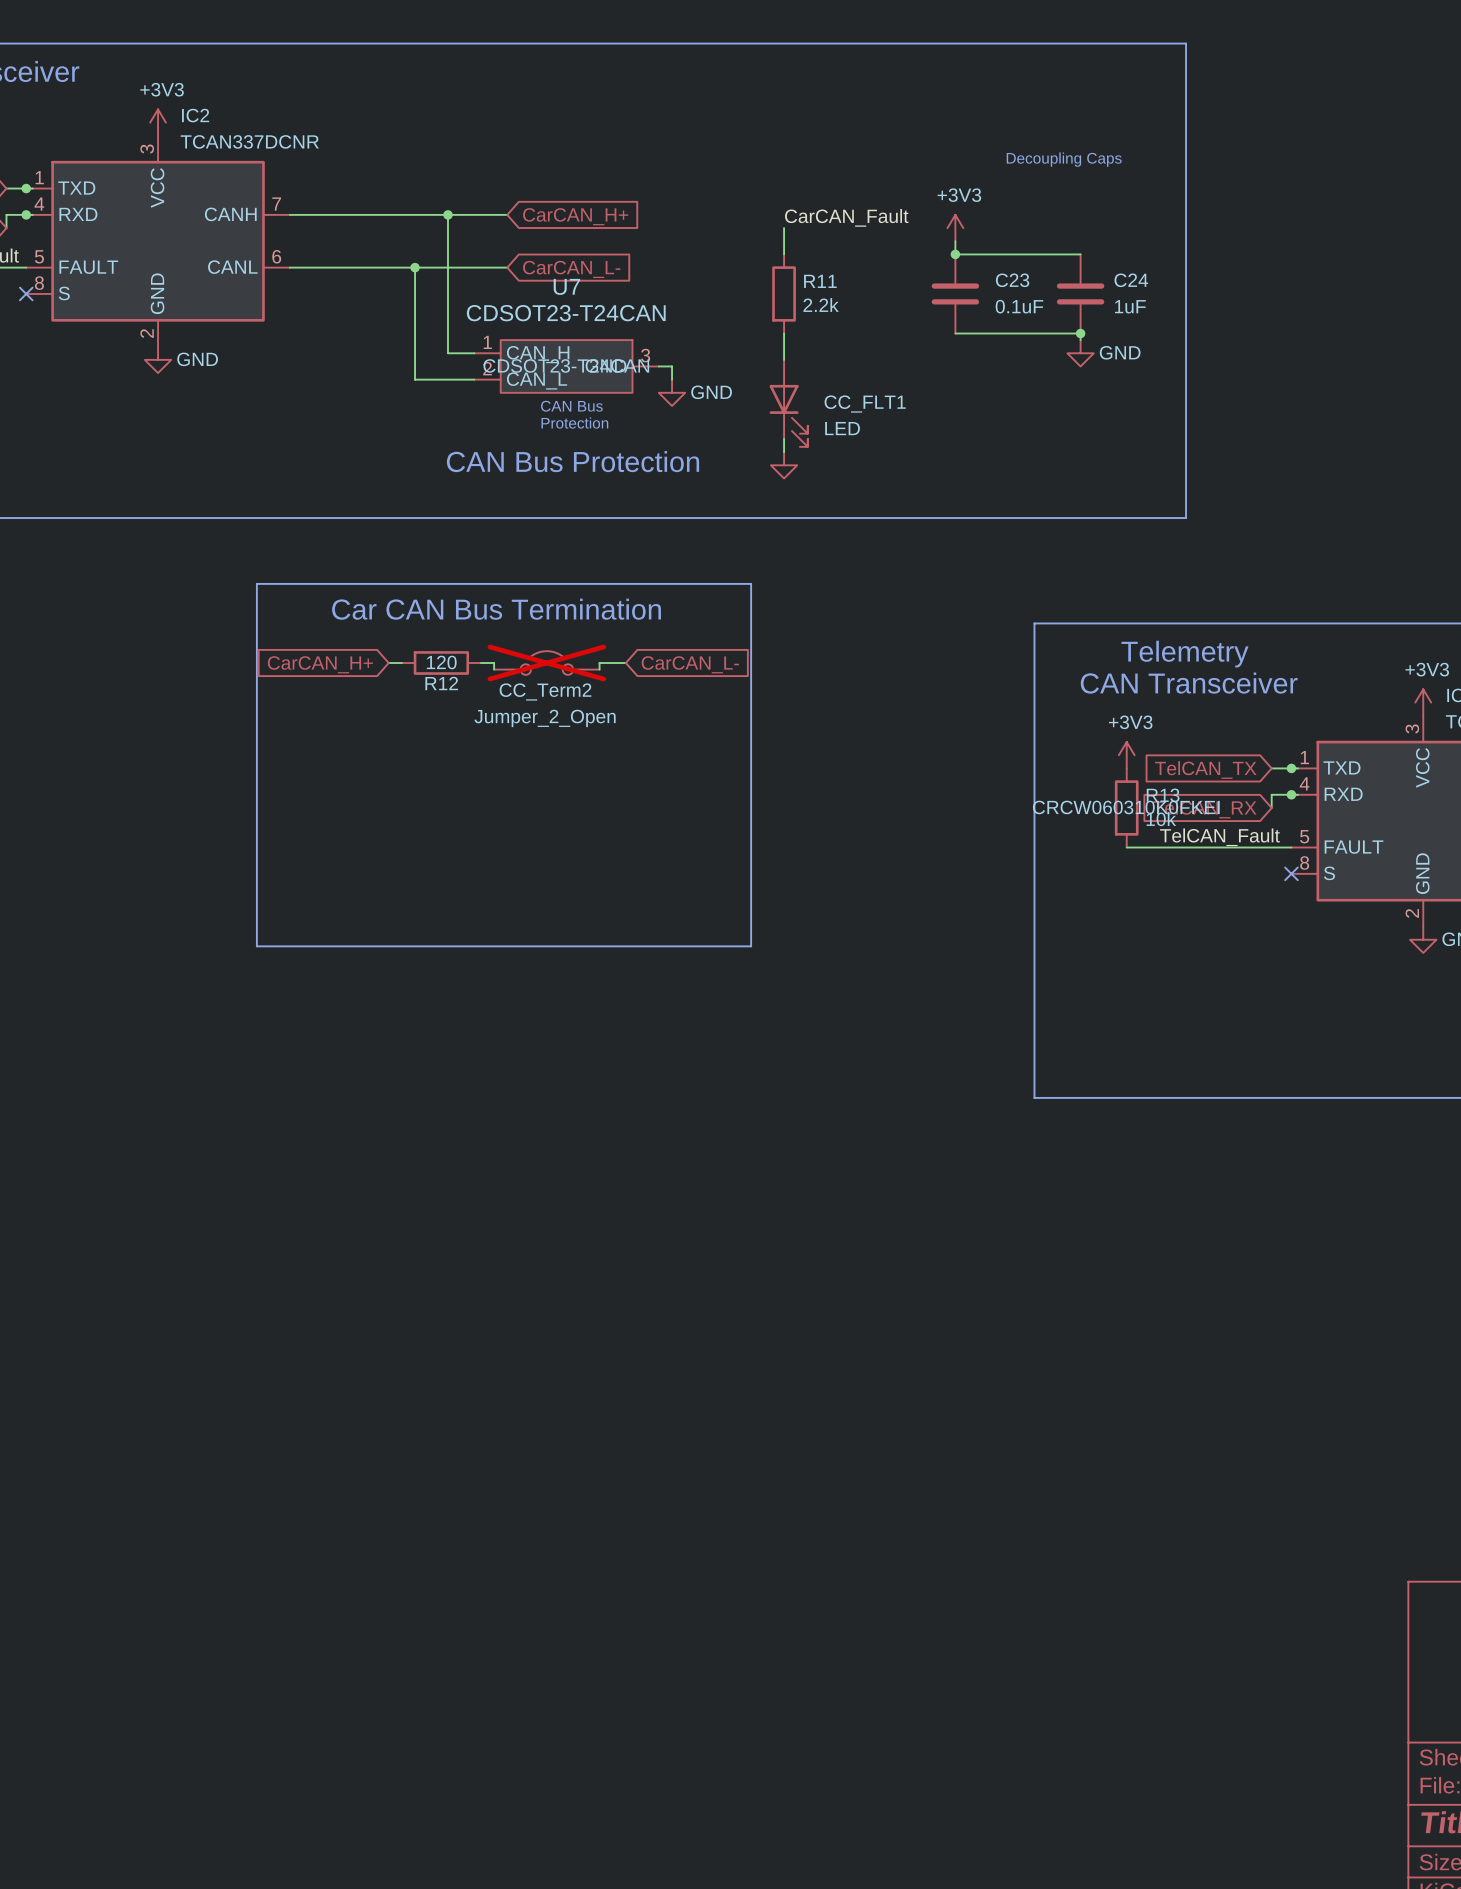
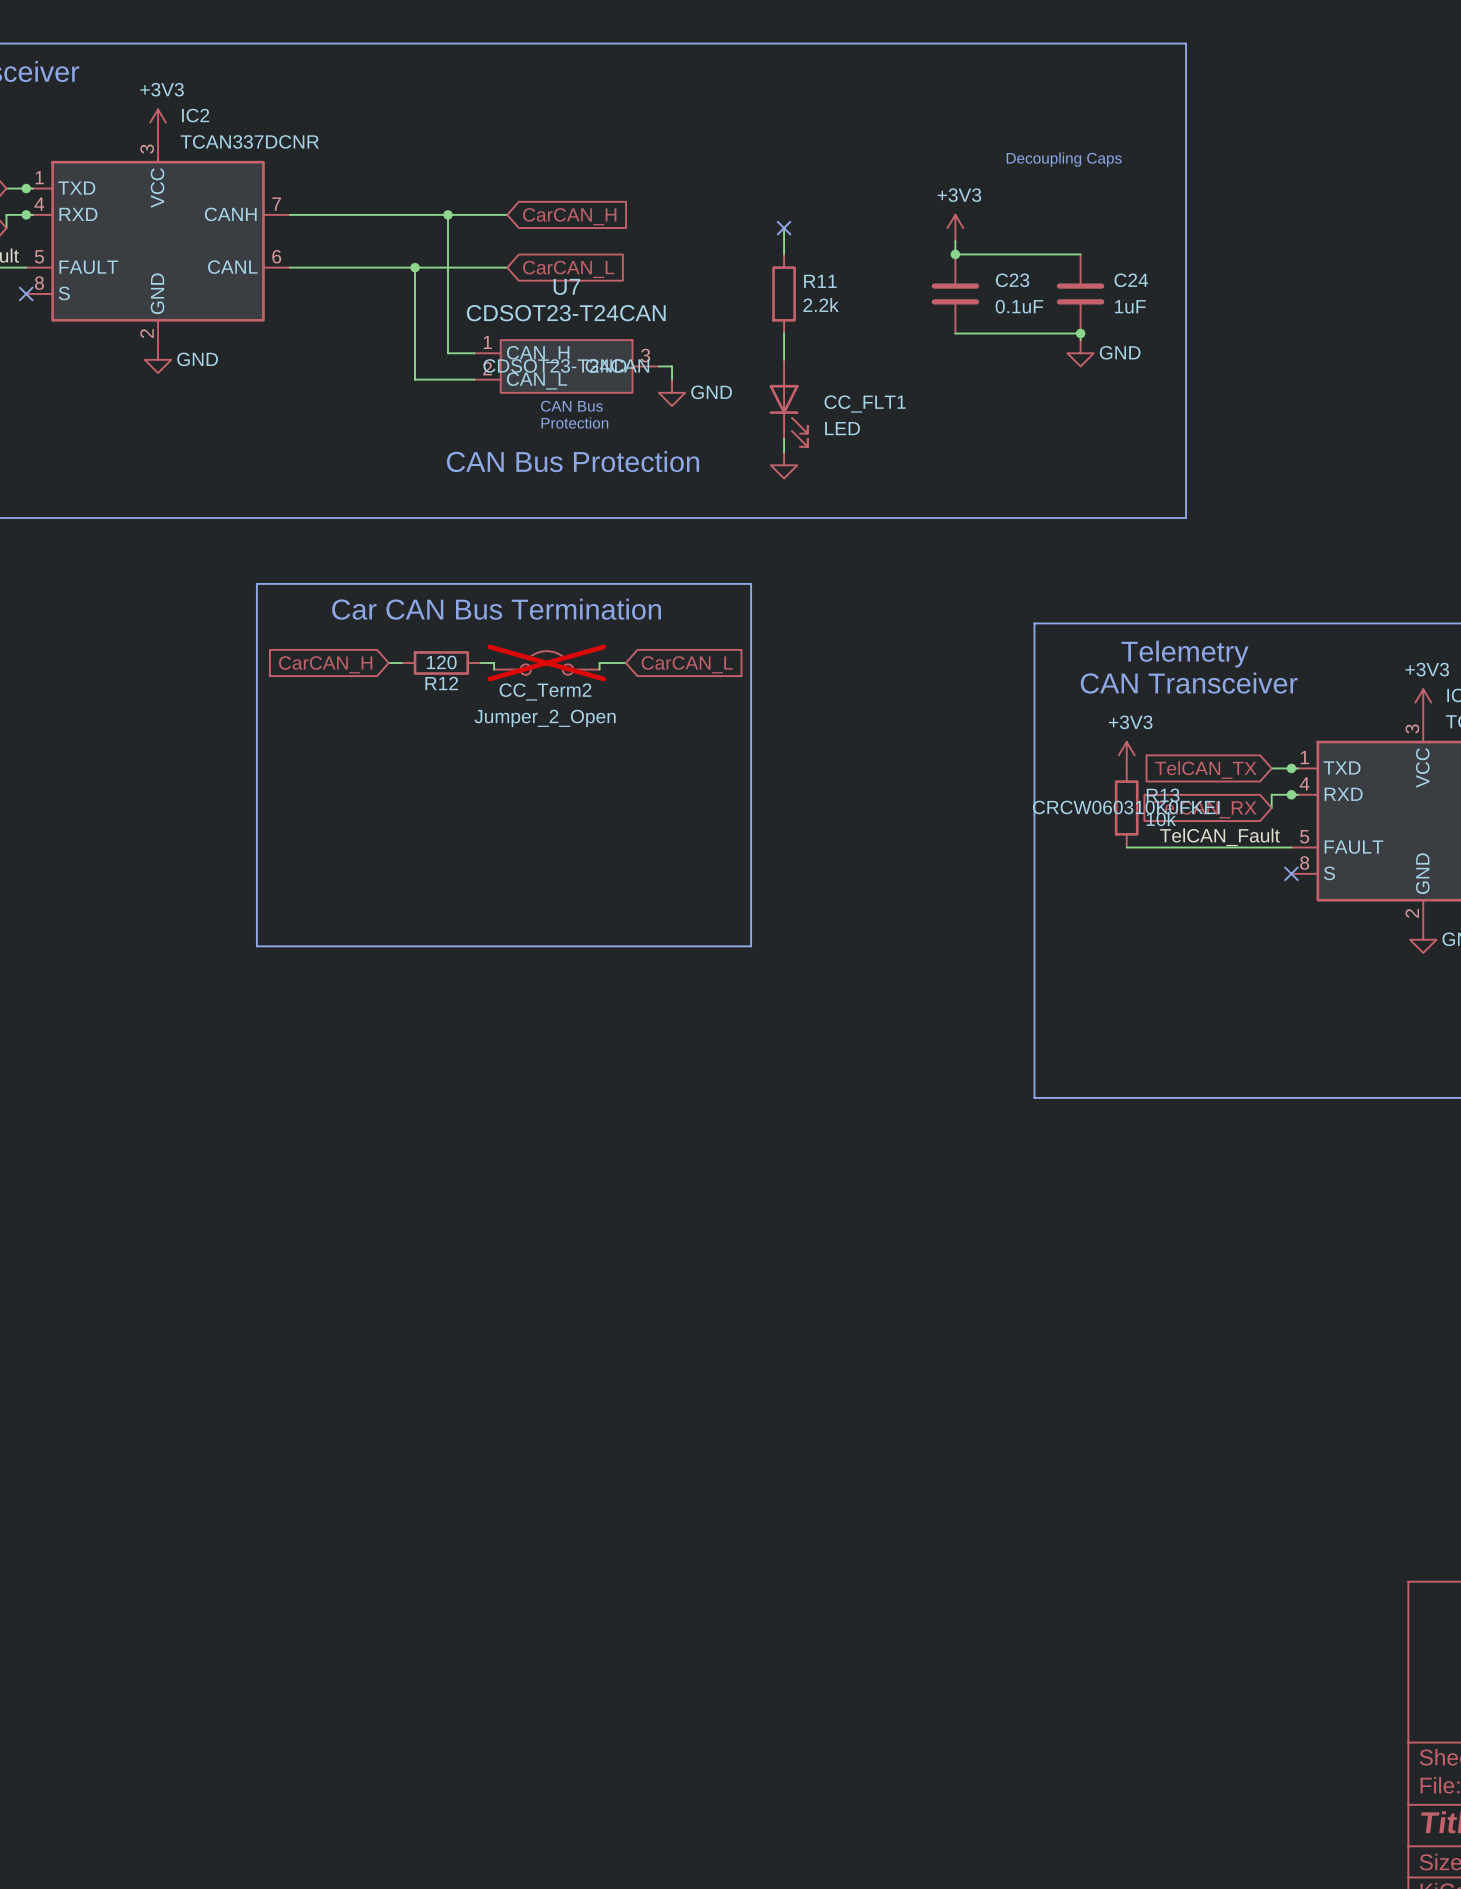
global label: CarCAN_H+ (575, 216) -> CarCAN_H (569, 216)
label: CarCAN_Fault (846, 217) -> none
no-connect mark: none -> (784, 228)
global label: CarCAN_L- (571, 269) -> CarCAN_L (568, 269)
global label: CarCAN_H+ (320, 664) -> CarCAN_H (325, 664)
global label: CarCAN_L- (690, 664) -> CarCAN_L (687, 664)

